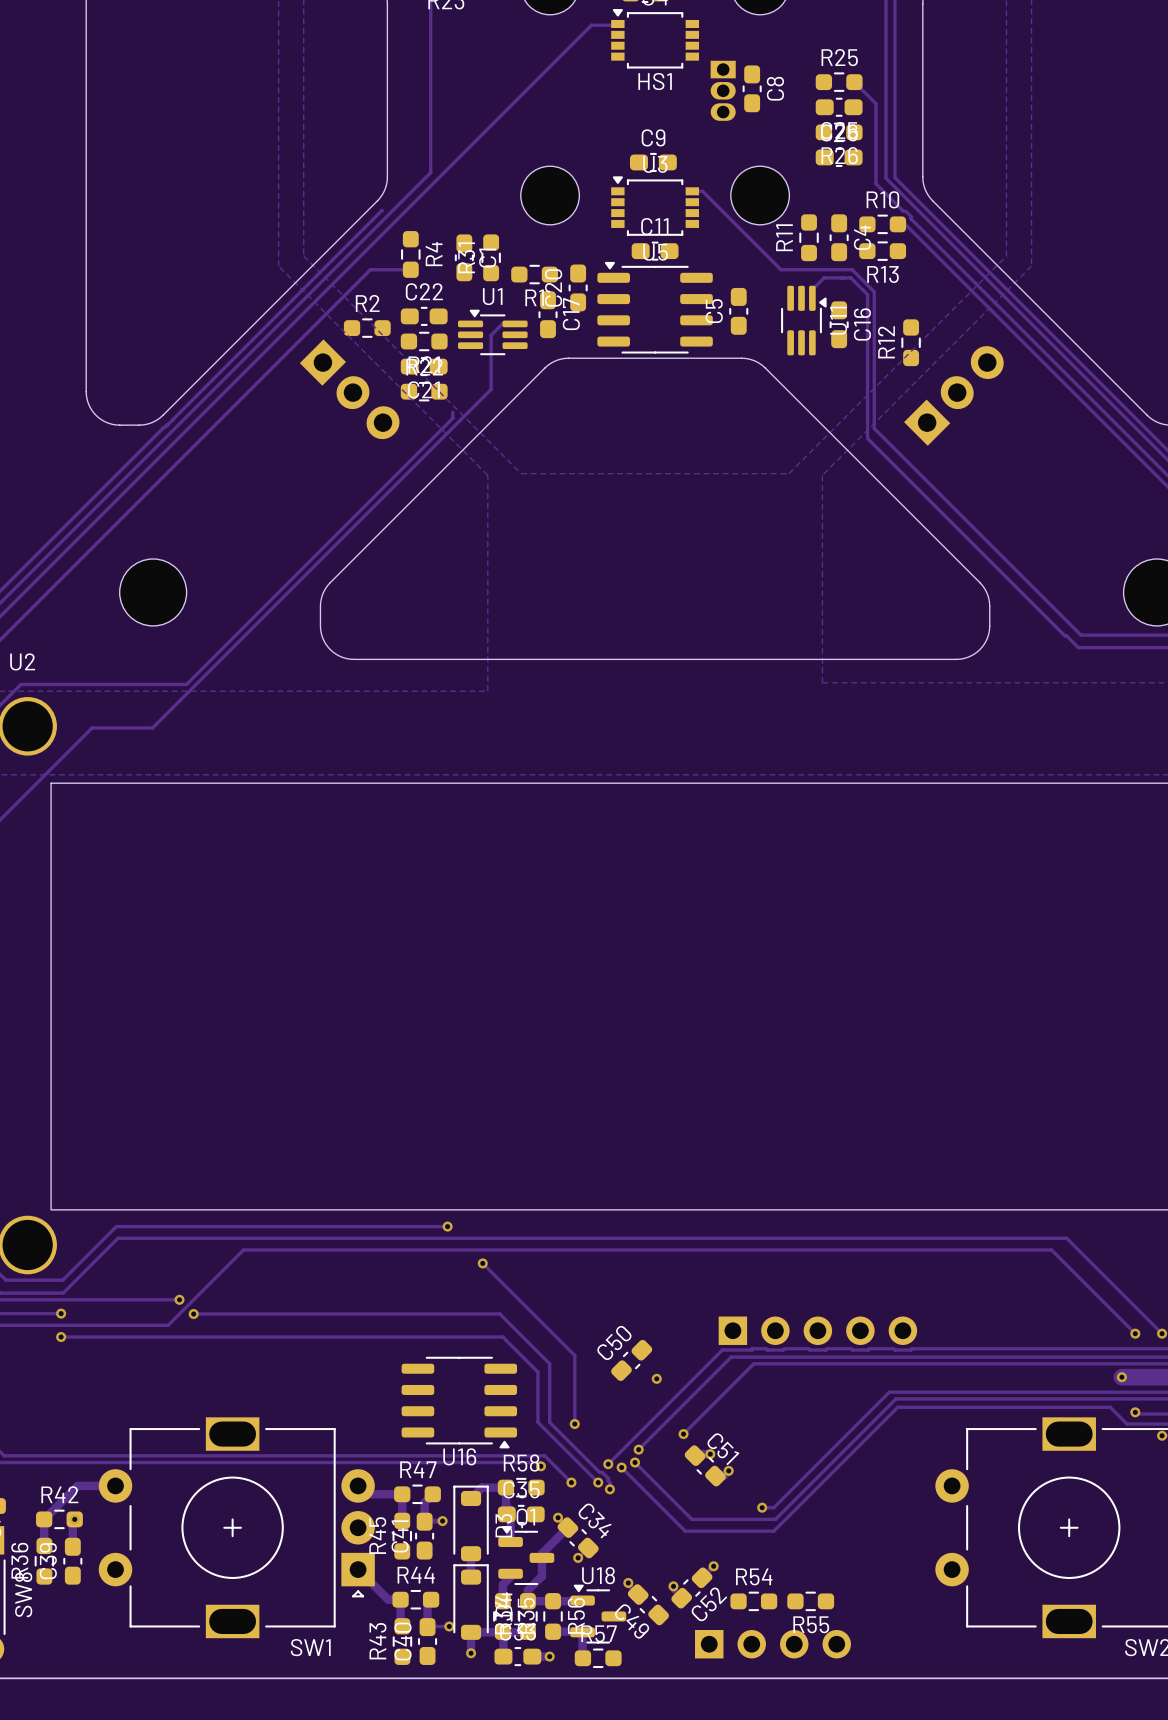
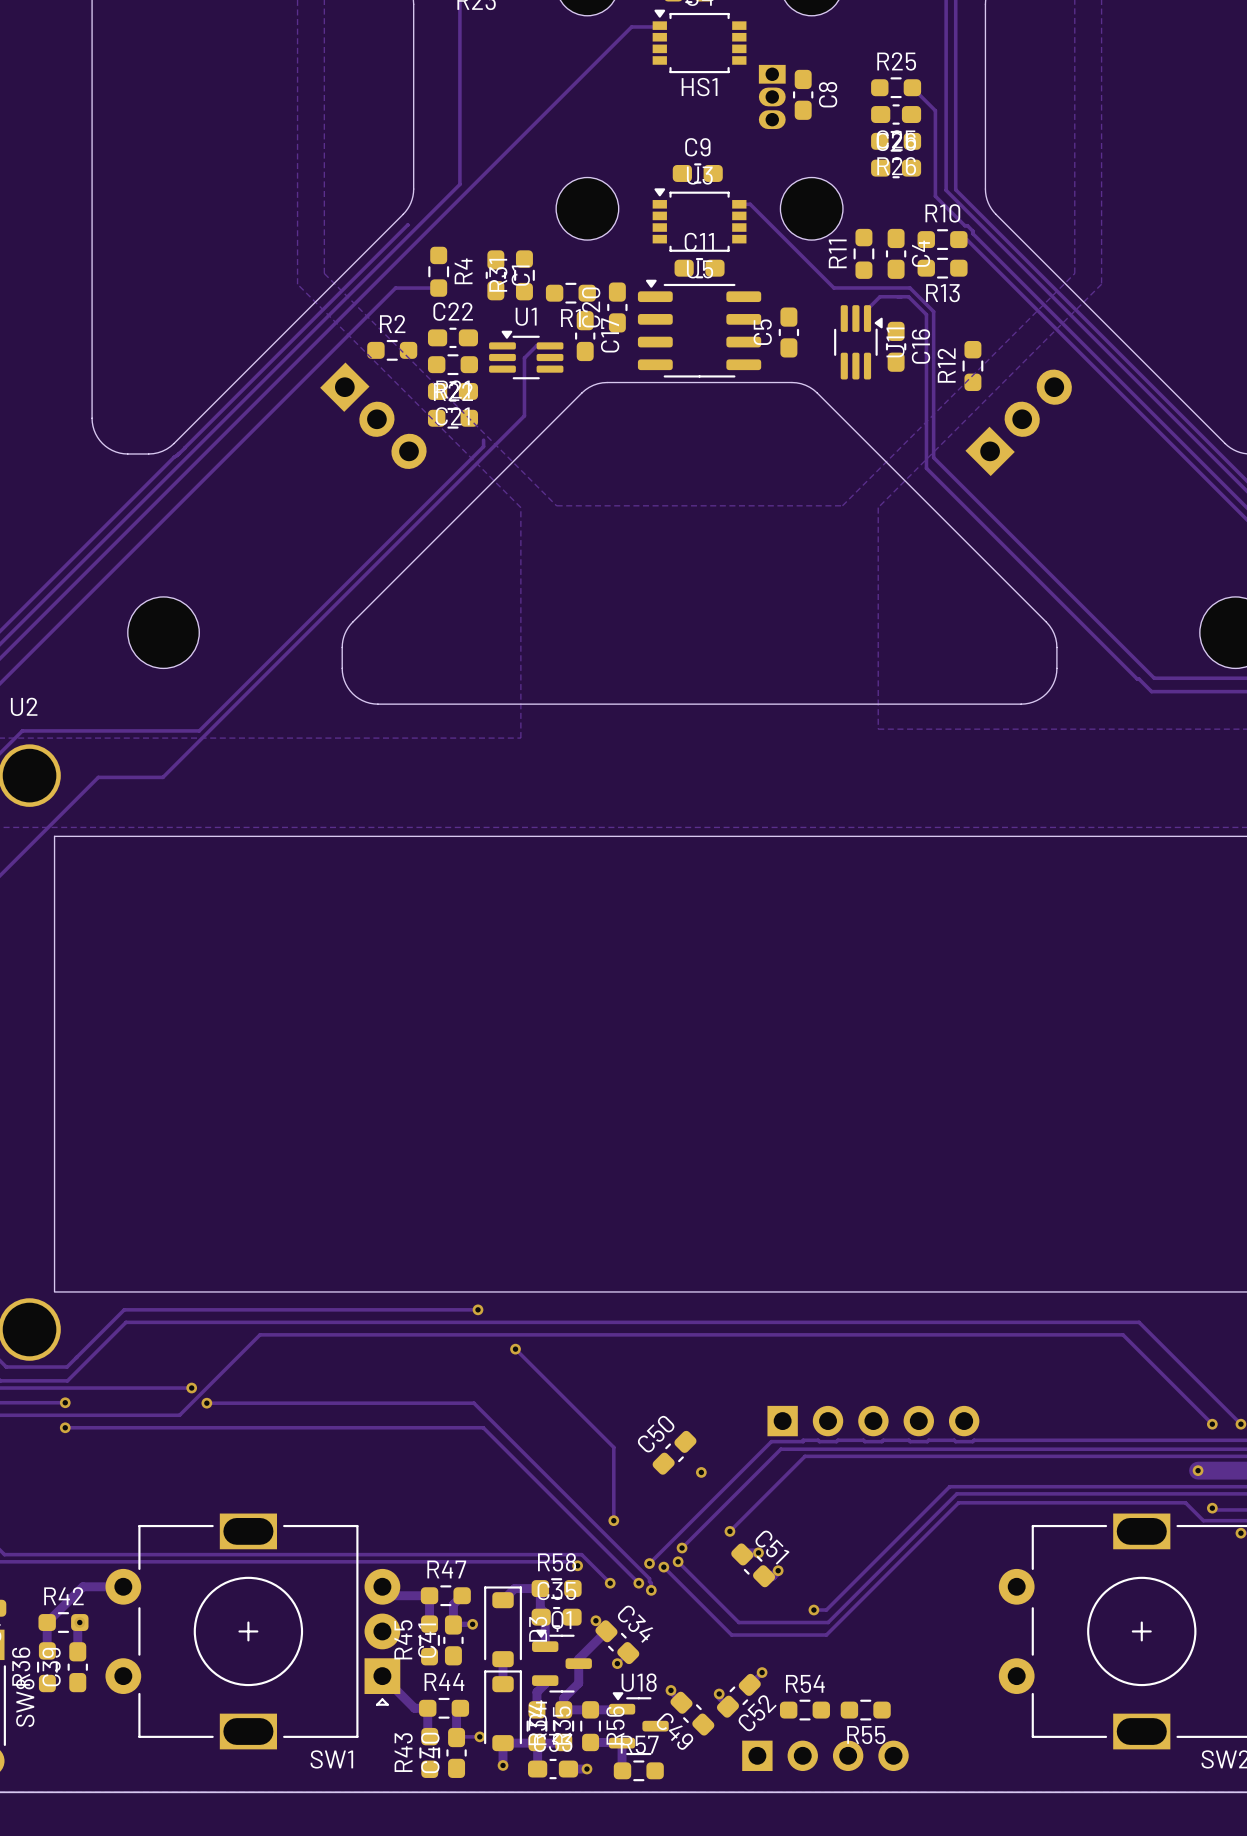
track: (443, 1314) (499, 1314) (549, 1363) (549, 1422) (599, 1472) (602, 1472) -> (473, 1403) (643, 1572)
track: (452, 1337) (502, 1337) (537, 1372) (537, 1422) -> (483, 1427) (574, 1518)
U16: (459, 1402) -> none

